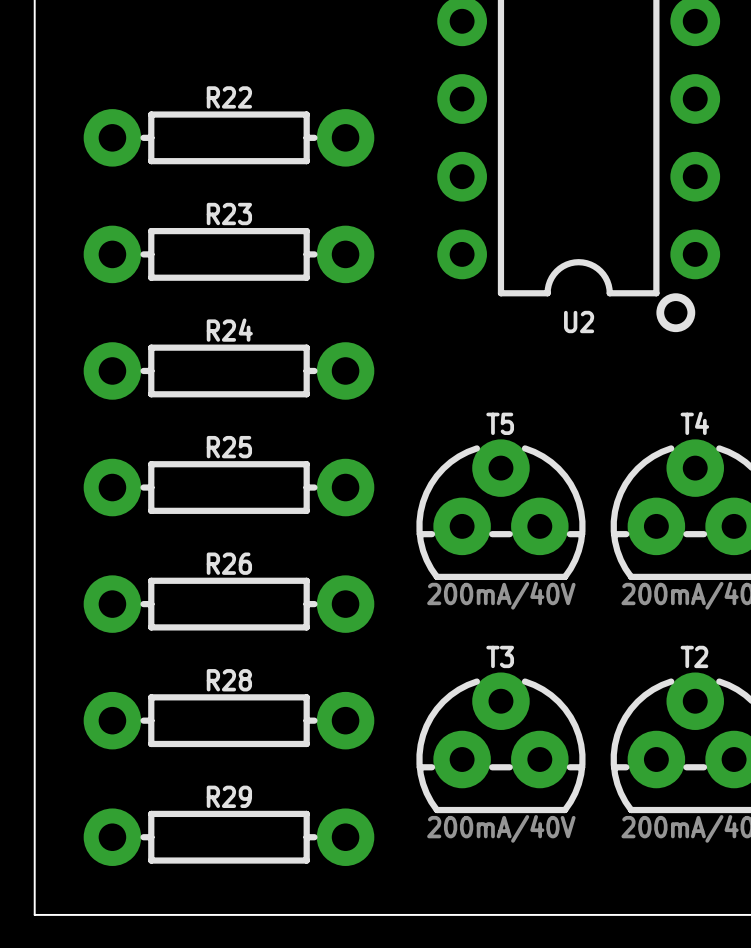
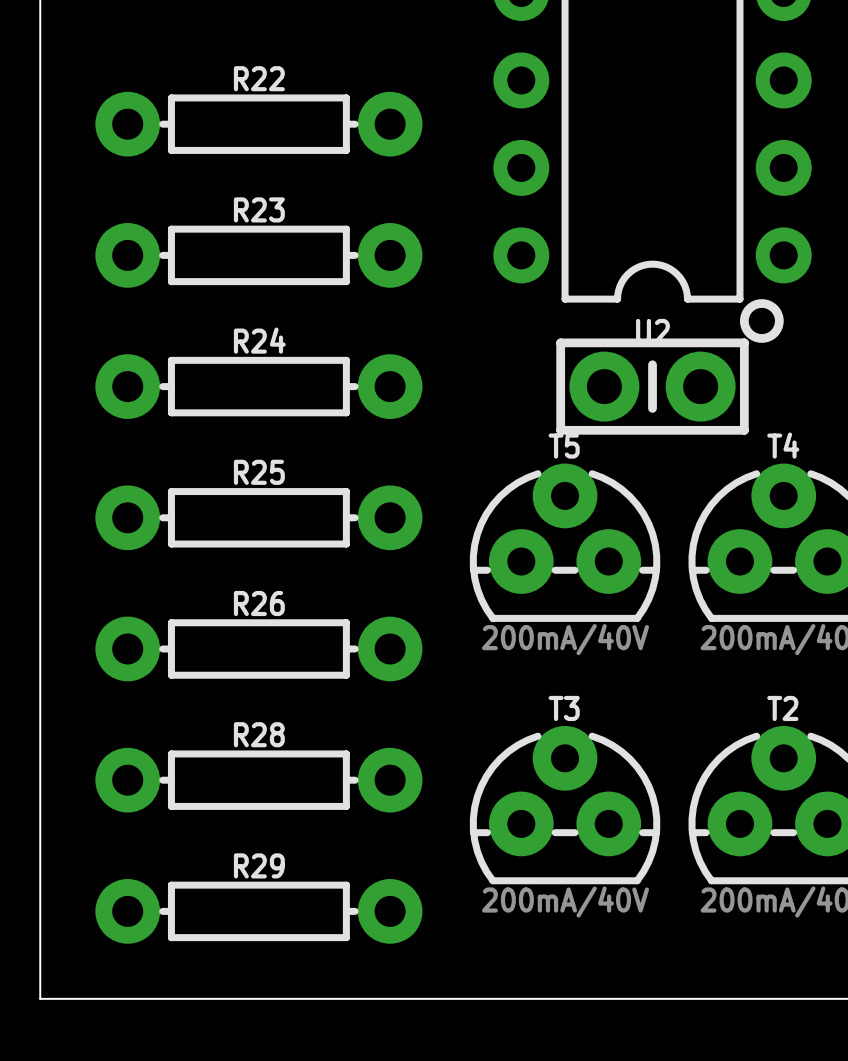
part: none -> (652, 386)

